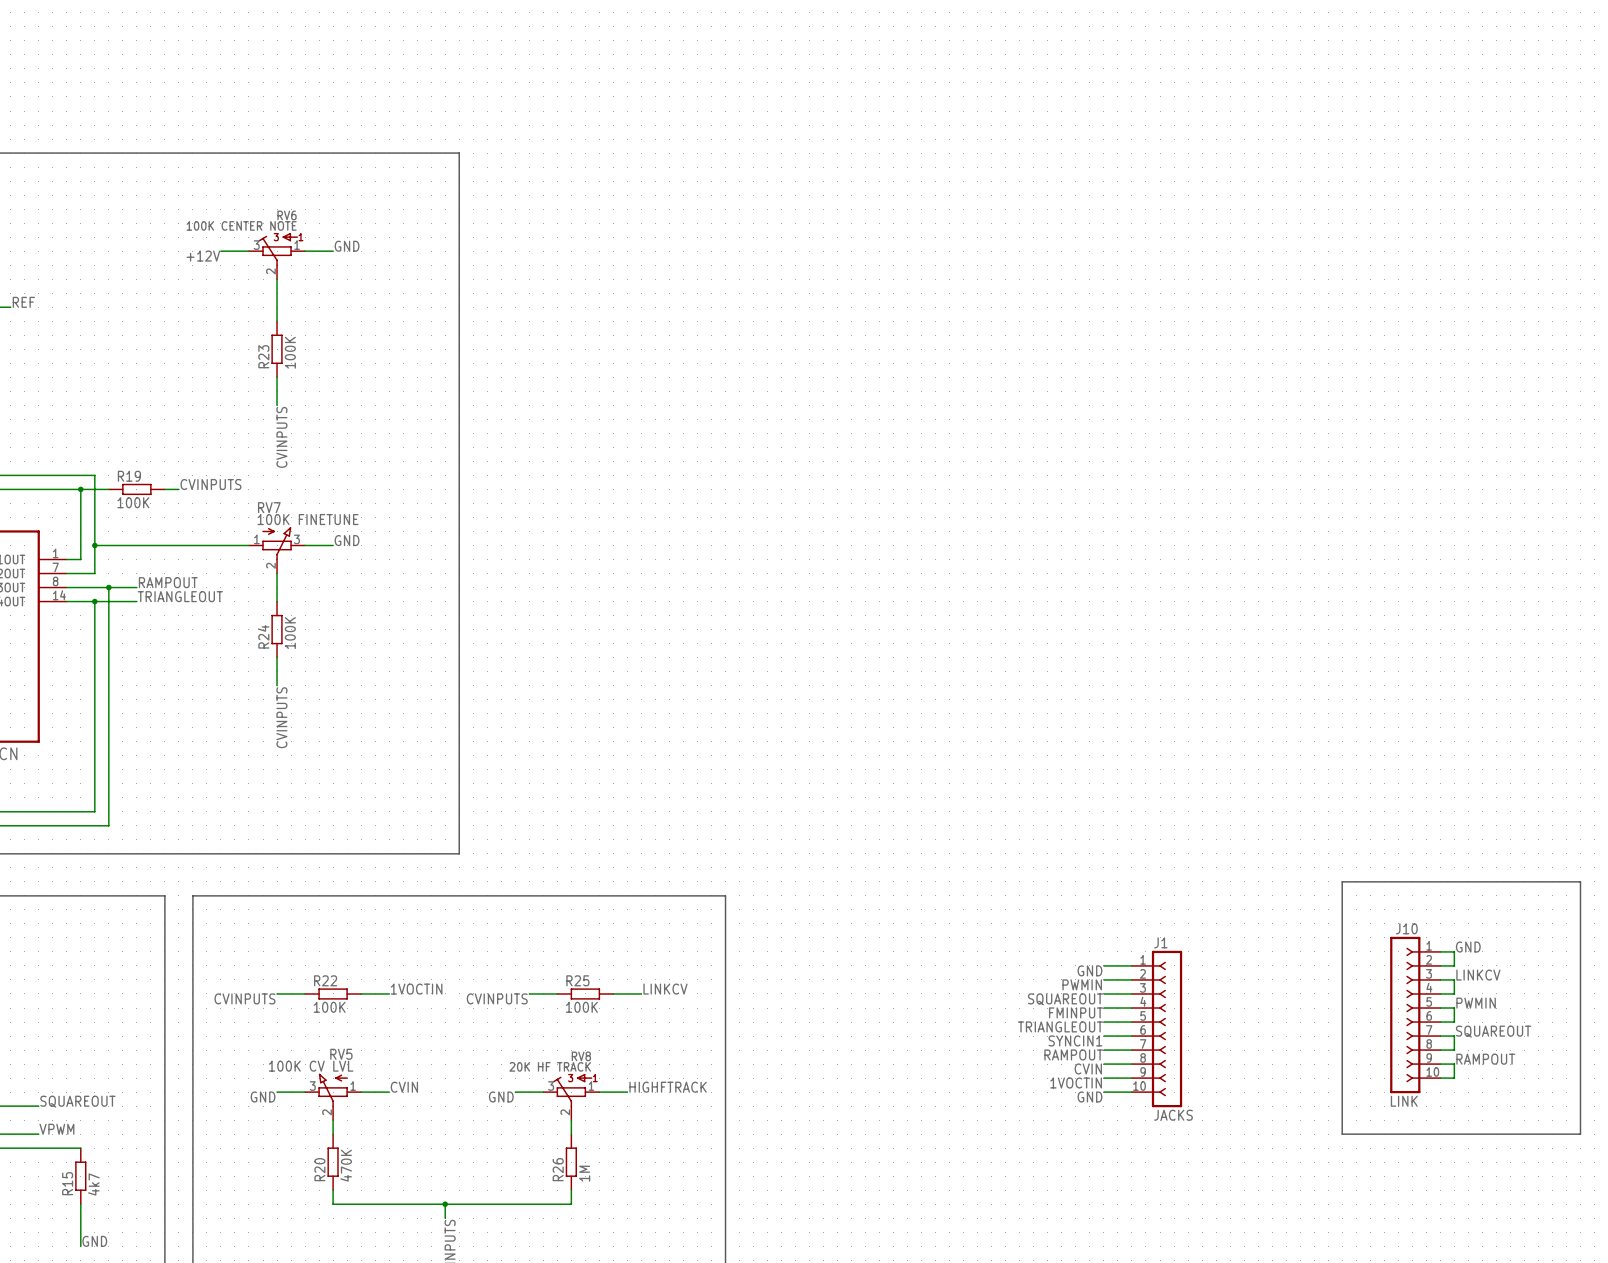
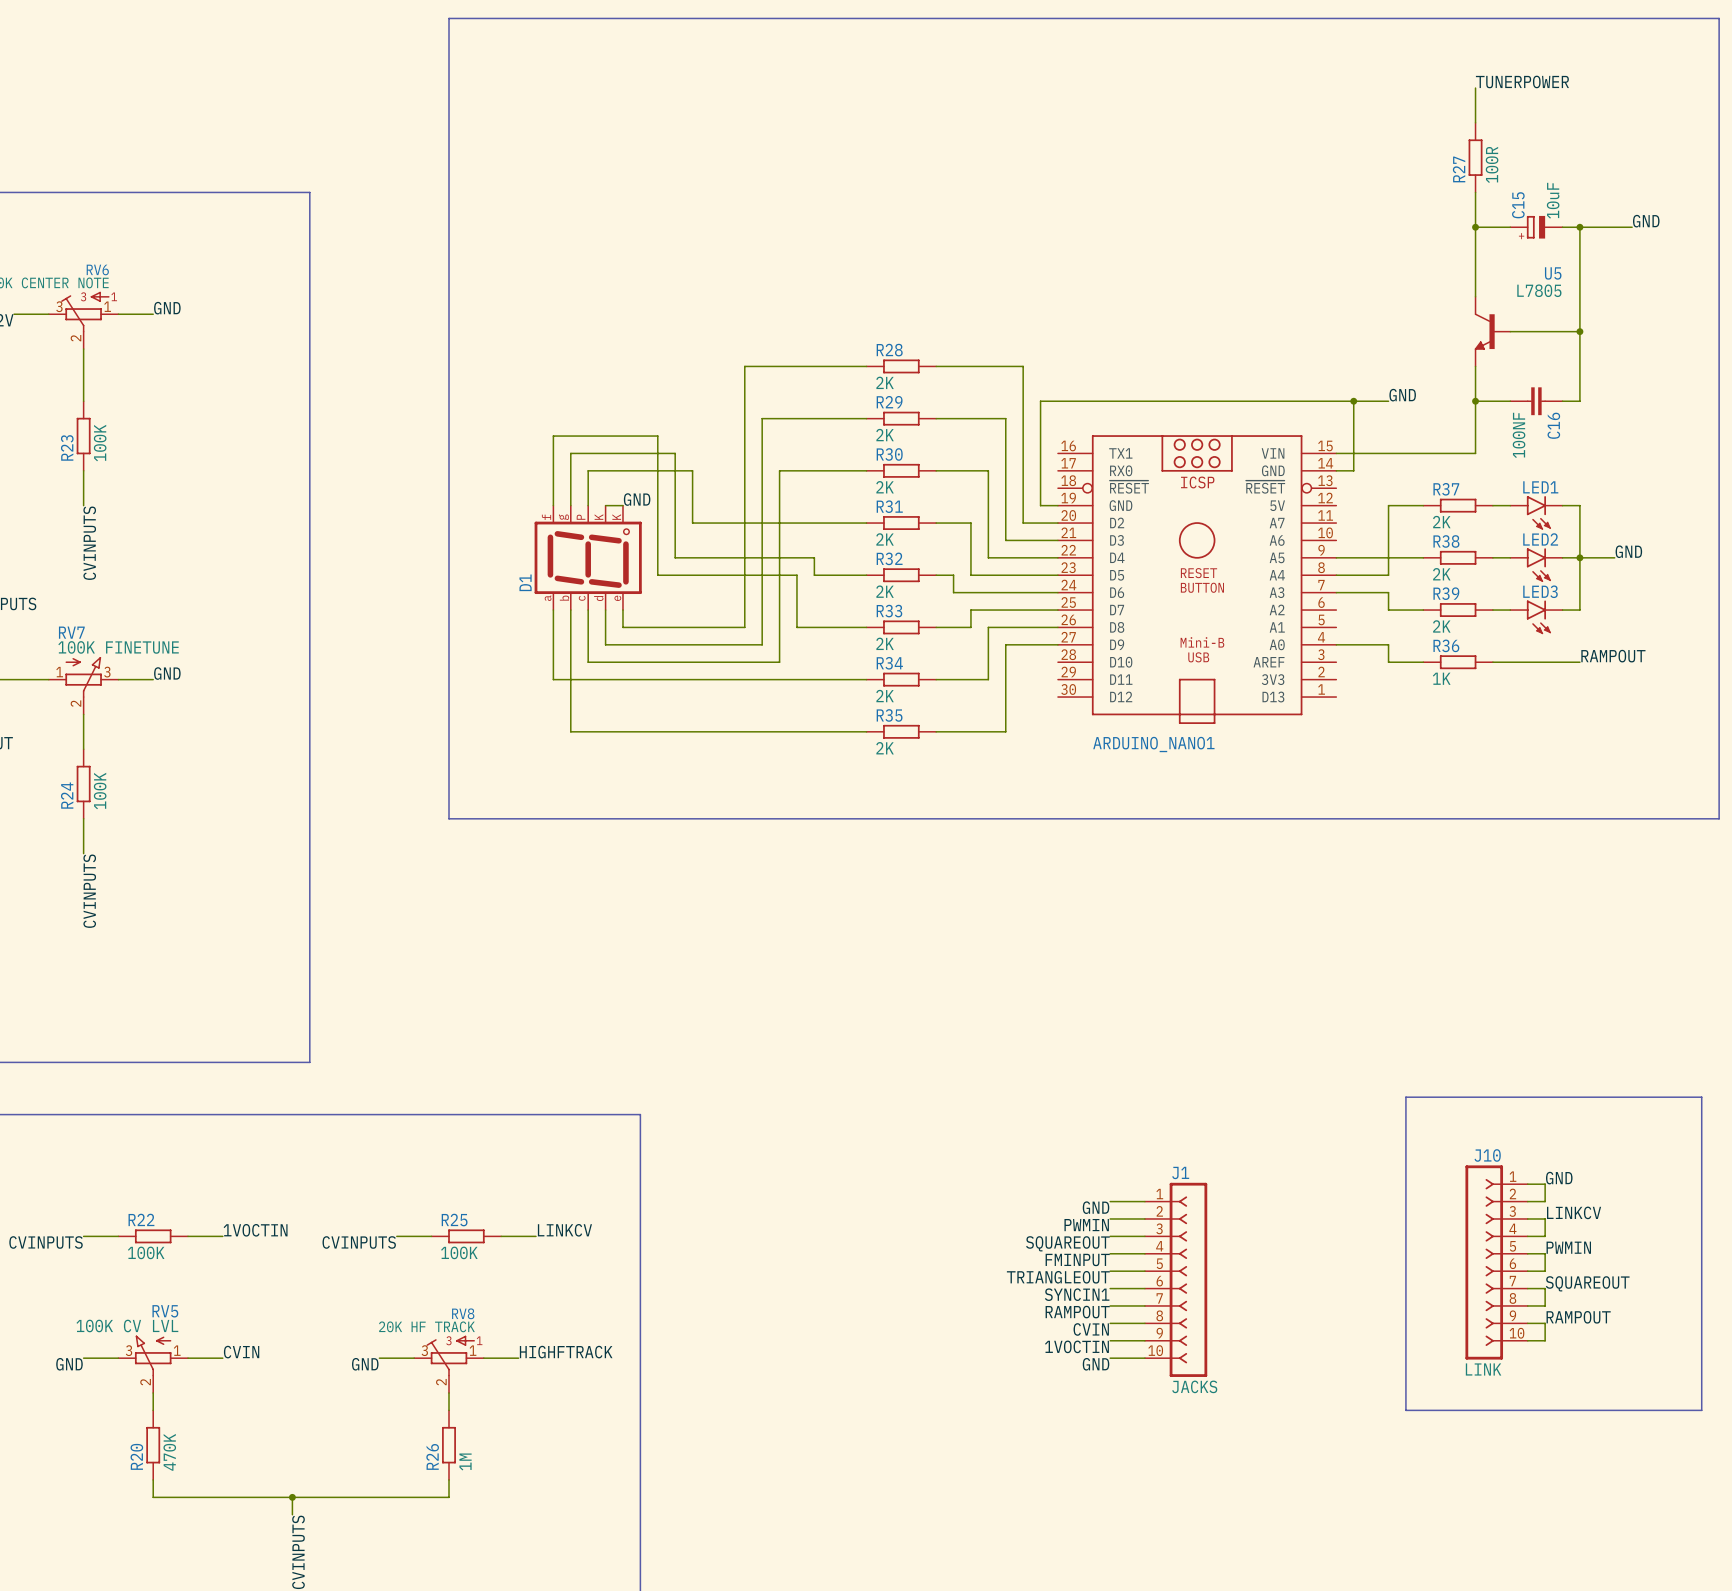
line: none -> (449, 18) (449, 818) (1719, 818) (1719, 18) (449, 18)
label: none -> TUNERPOWER (1522, 81)
wire: none -> (1475, 88) (1475, 122)
R27: none -> 100R (1475, 157)
wire: none -> (1475, 192) (1475, 296)
label: none -> GND (1646, 221)
wire: none -> (1475, 227) (1510, 227)
junction: none -> (1475, 227)
C15: none -> 10uF (1536, 227)
wire: none -> (1562, 227) (1632, 227)
wire: none -> (1579, 227) (1579, 401) (1562, 401)
junction: none -> (1579, 227)
U5: none -> L7805 (1492, 331)
wire: none -> (1510, 331) (1579, 331)
junction: none -> (1579, 331)
wire: none -> (866, 366) (744, 366) (744, 627) (622, 627) (622, 610)
R28: none -> 2K (901, 366)
wire: none -> (936, 366) (1023, 366) (1023, 523) (1057, 523)
wire: none -> (1475, 366) (1475, 453) (1336, 453)
label: none -> GND (1402, 395)
wire: none -> (1353, 401) (1353, 470) (1336, 470)
junction: none -> (1353, 401)
wire: none -> (1388, 401) (1040, 401) (1040, 505) (1057, 505)
wire: none -> (1475, 401) (1510, 401)
junction: none -> (1475, 401)
C16: none -> 100NF (1536, 401)
wire: none -> (866, 418) (762, 418) (762, 644) (605, 644) (605, 610)
R29: none -> 2K (901, 418)
wire: none -> (936, 418) (1005, 418) (1005, 540) (1057, 540)
wire: none -> (866, 470) (779, 470) (779, 662) (588, 662) (588, 610)
R30: none -> 2K (901, 470)
wire: none -> (936, 470) (988, 470) (988, 557) (1057, 557)
label: none -> GND (637, 499)
wire: none -> (553, 505) (553, 436) (657, 436) (657, 575) (796, 575) (796, 627) (866, 627)
wire: none -> (570, 505) (570, 453) (675, 453) (675, 557) (814, 557) (814, 575) (866, 575)
wire: none -> (588, 505) (588, 470) (692, 470) (692, 523) (866, 523)
wire: none -> (605, 505) (622, 505)
wire: none -> (1423, 505) (1388, 505) (1388, 575) (1336, 575)
R37: none -> 2K (1458, 505)
wire: none -> (1492, 505) (1510, 505)
wire: none -> (1562, 505) (1579, 505) (1579, 610) (1562, 610)
LED1: none -> (1536, 512)
R31: none -> 2K (901, 523)
wire: none -> (936, 523) (970, 523) (970, 575) (1057, 575)
label: none -> GND (1628, 551)
D1: none -> (588, 557)
wire: none -> (1336, 557) (1423, 557)
R38: none -> 2K (1458, 557)
wire: none -> (1492, 557) (1510, 557)
wire: none -> (1562, 557) (1614, 557)
junction: none -> (1579, 557)
LED2: none -> (1536, 565)
R32: none -> 2K (901, 575)
wire: none -> (936, 575) (953, 575) (953, 592) (1057, 592)
ARDUINO_NANO1: none -> (1197, 579)
wire: none -> (1336, 592) (1388, 592) (1388, 610) (1423, 610)
wire: none -> (553, 610) (553, 679) (866, 679)
wire: none -> (570, 610) (570, 731) (866, 731)
wire: none -> (1057, 610) (970, 610) (970, 627) (936, 627)
R39: none -> 2K (1458, 610)
wire: none -> (1492, 610) (1510, 610)
LED3: none -> (1536, 617)
R33: none -> 2K (901, 627)
wire: none -> (1057, 627) (988, 627) (988, 679) (936, 679)
wire: none -> (1057, 644) (1005, 644) (1005, 731) (936, 731)
wire: none -> (1336, 644) (1388, 644) (1388, 662) (1423, 662)
label: none -> RAMPOUT (1613, 656)
R36: none -> 1K (1458, 662)
wire: none -> (1492, 662) (1579, 662)
R34: none -> 2K (901, 679)
R35: none -> 2K (901, 731)

